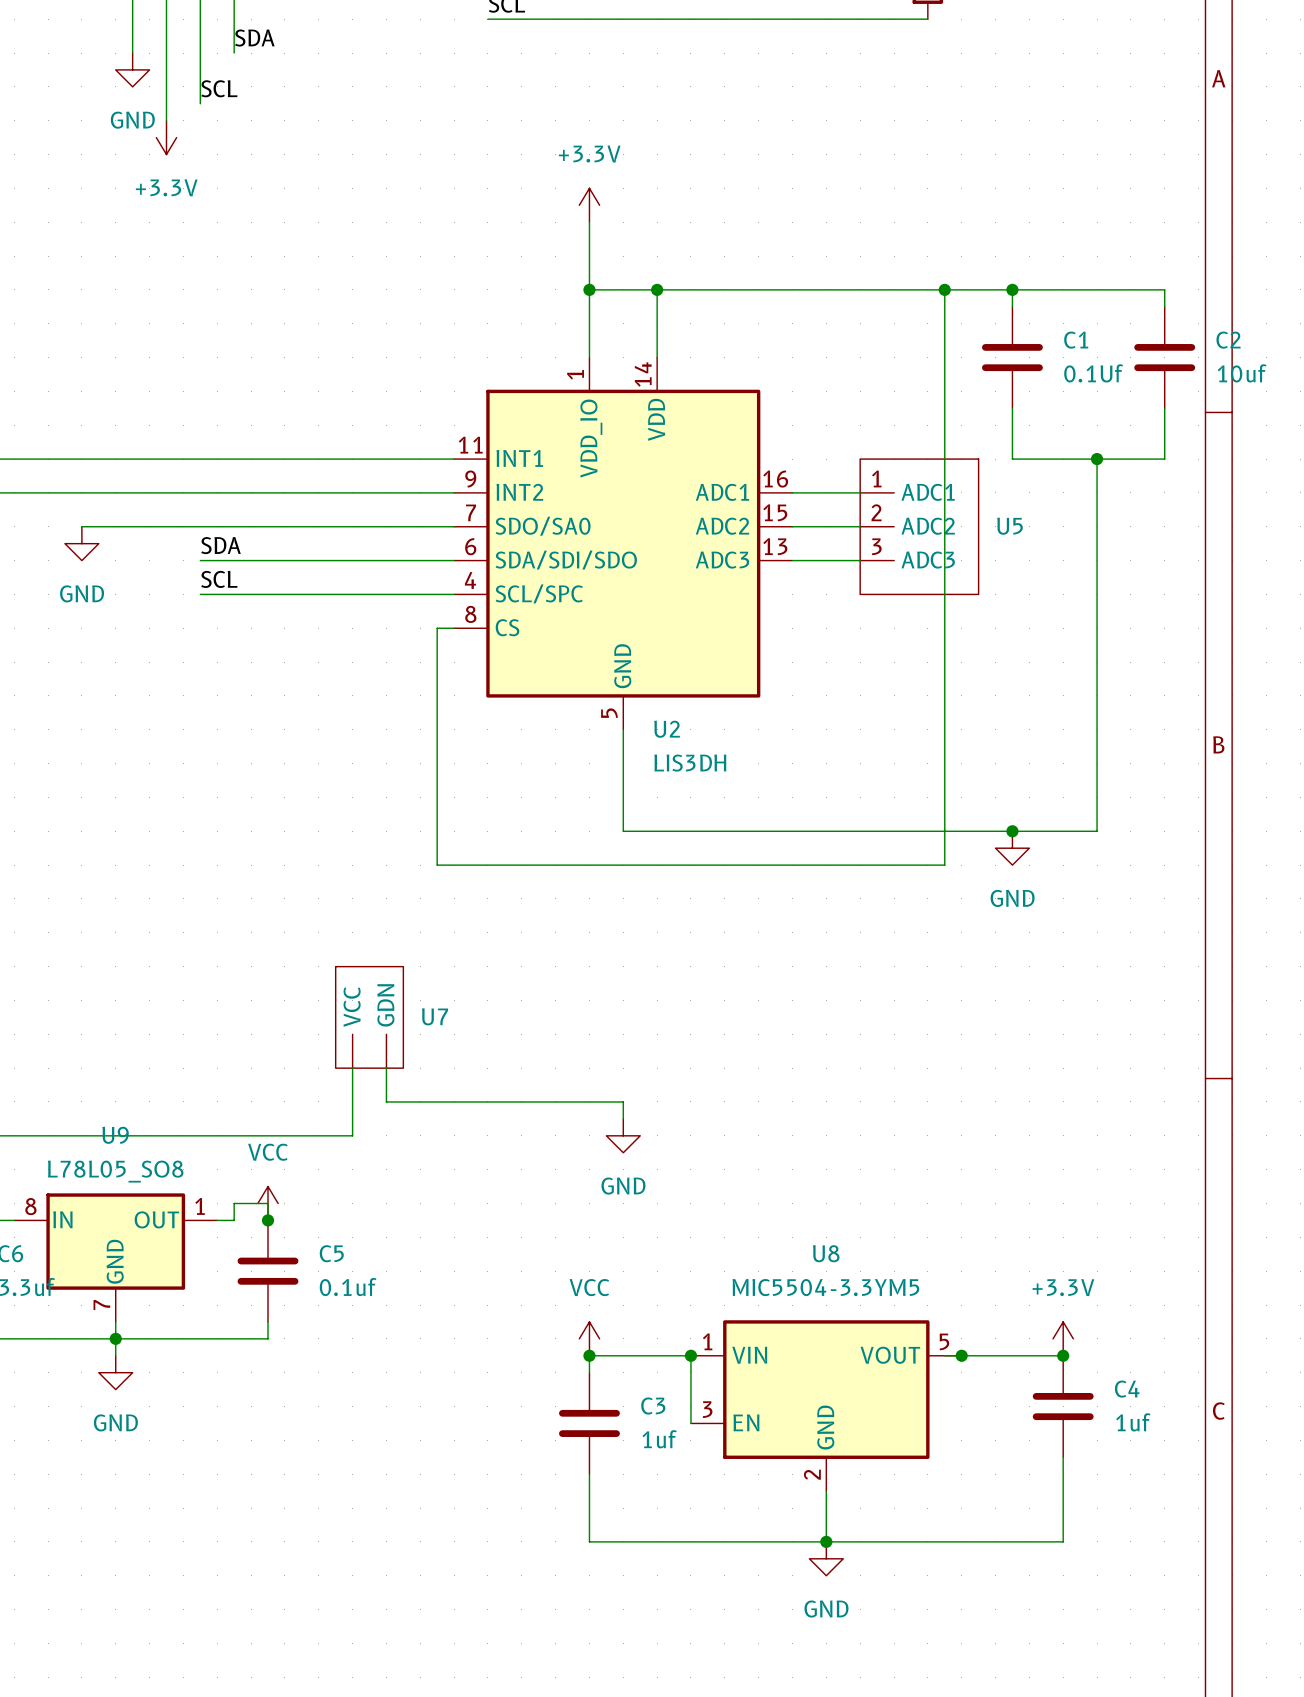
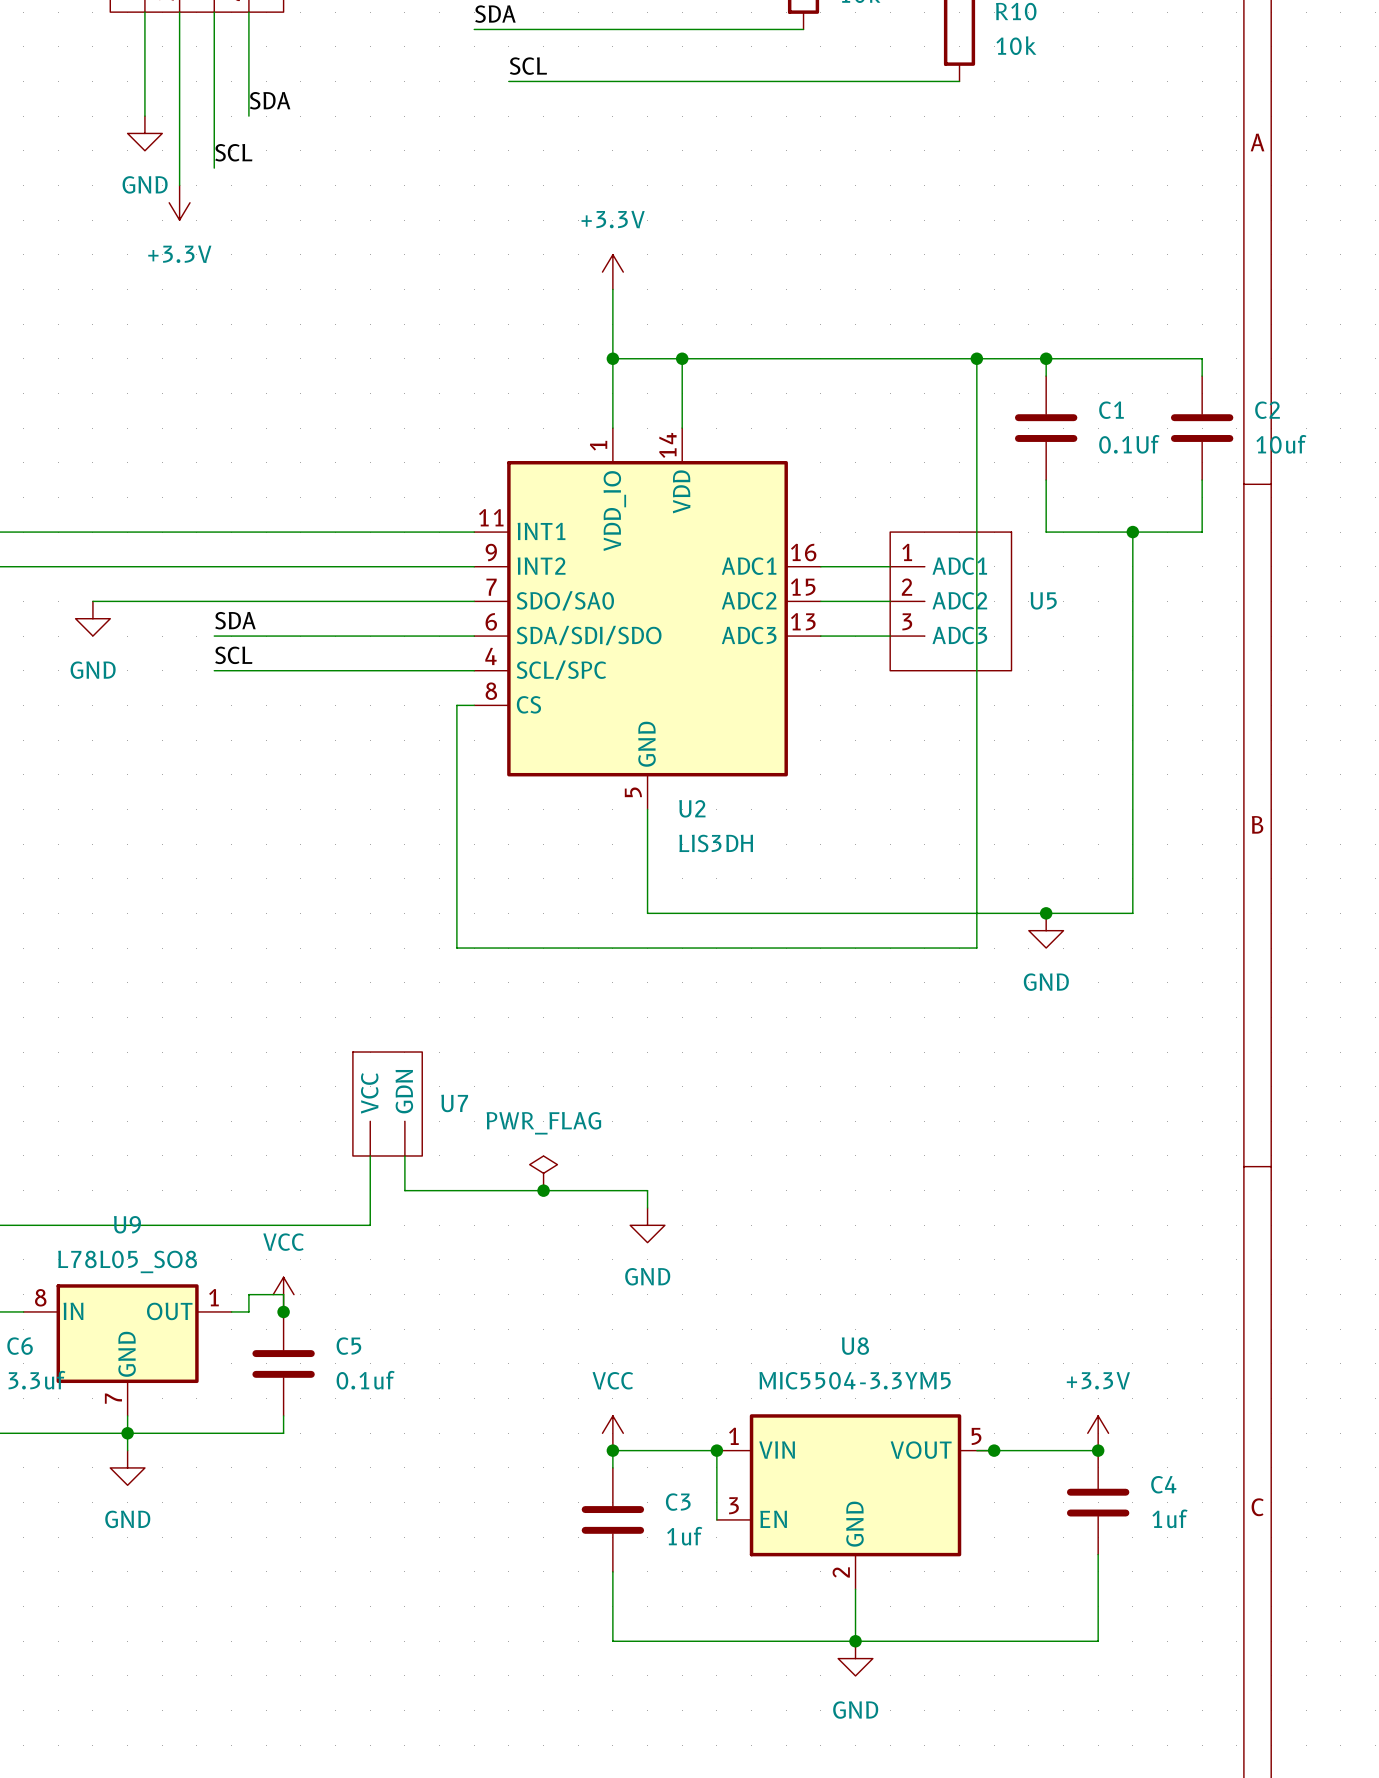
power symbol: none -> PWR_FLAG (543, 1173)
junction: none -> (543, 1190)

